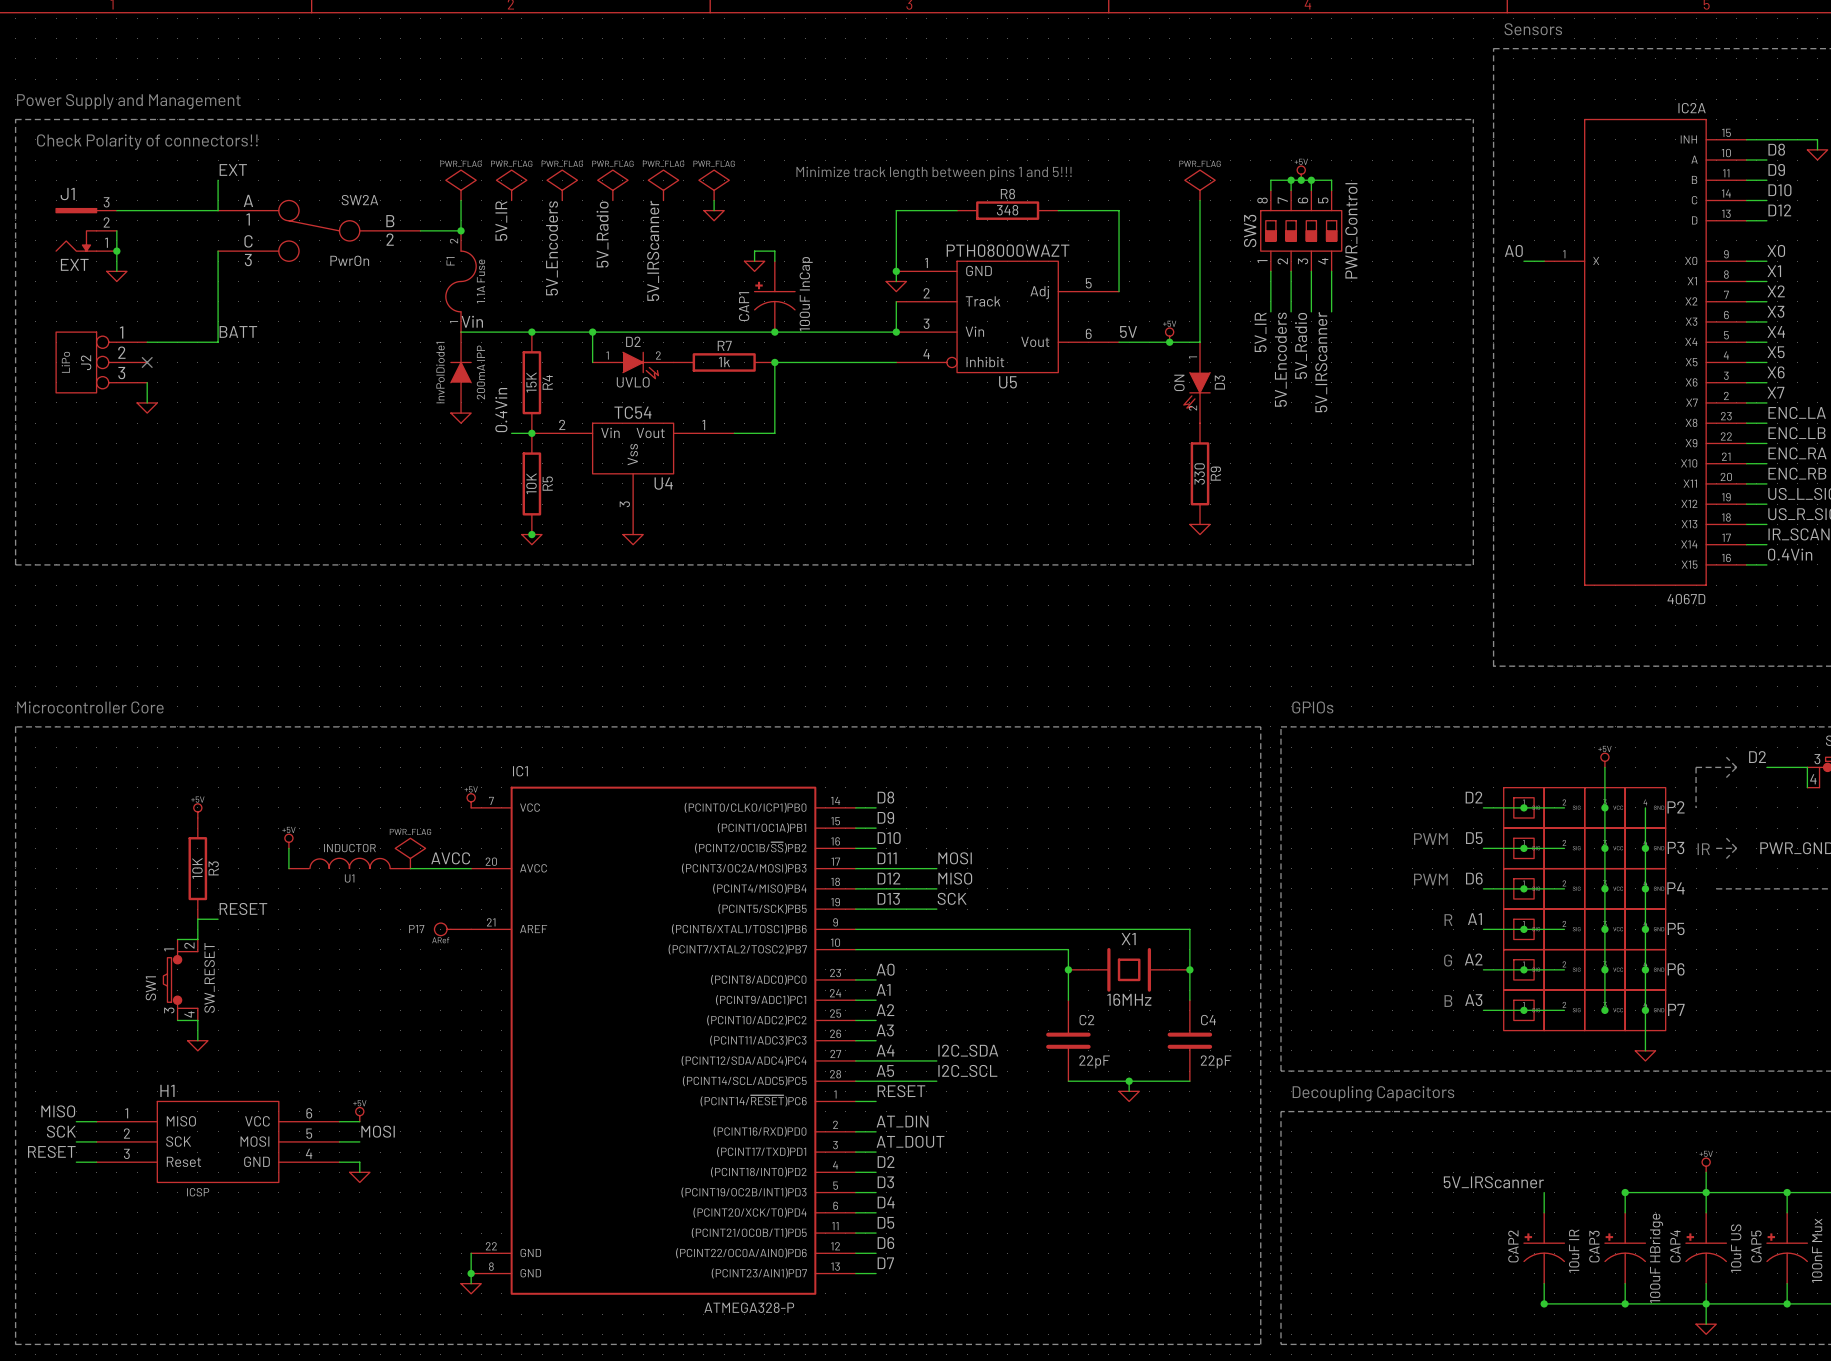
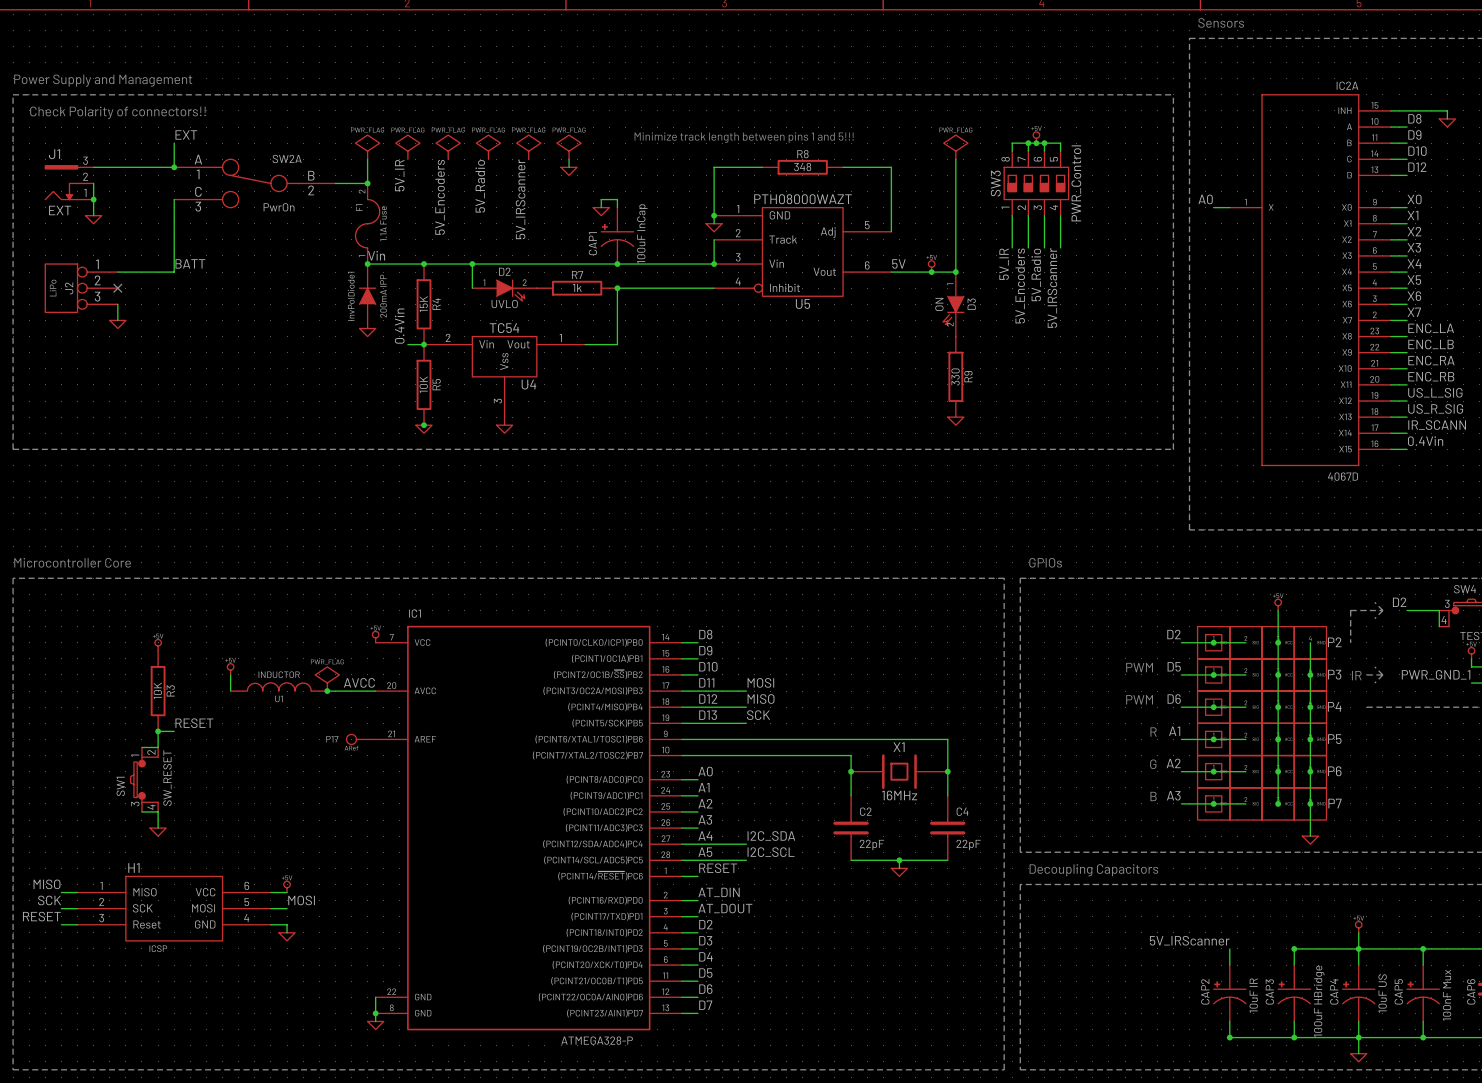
junction: none -> (174, 167)
junction: none -> (367, 264)
junction: none -> (955, 272)
junction: none -> (327, 691)
junction: none -> (158, 731)

